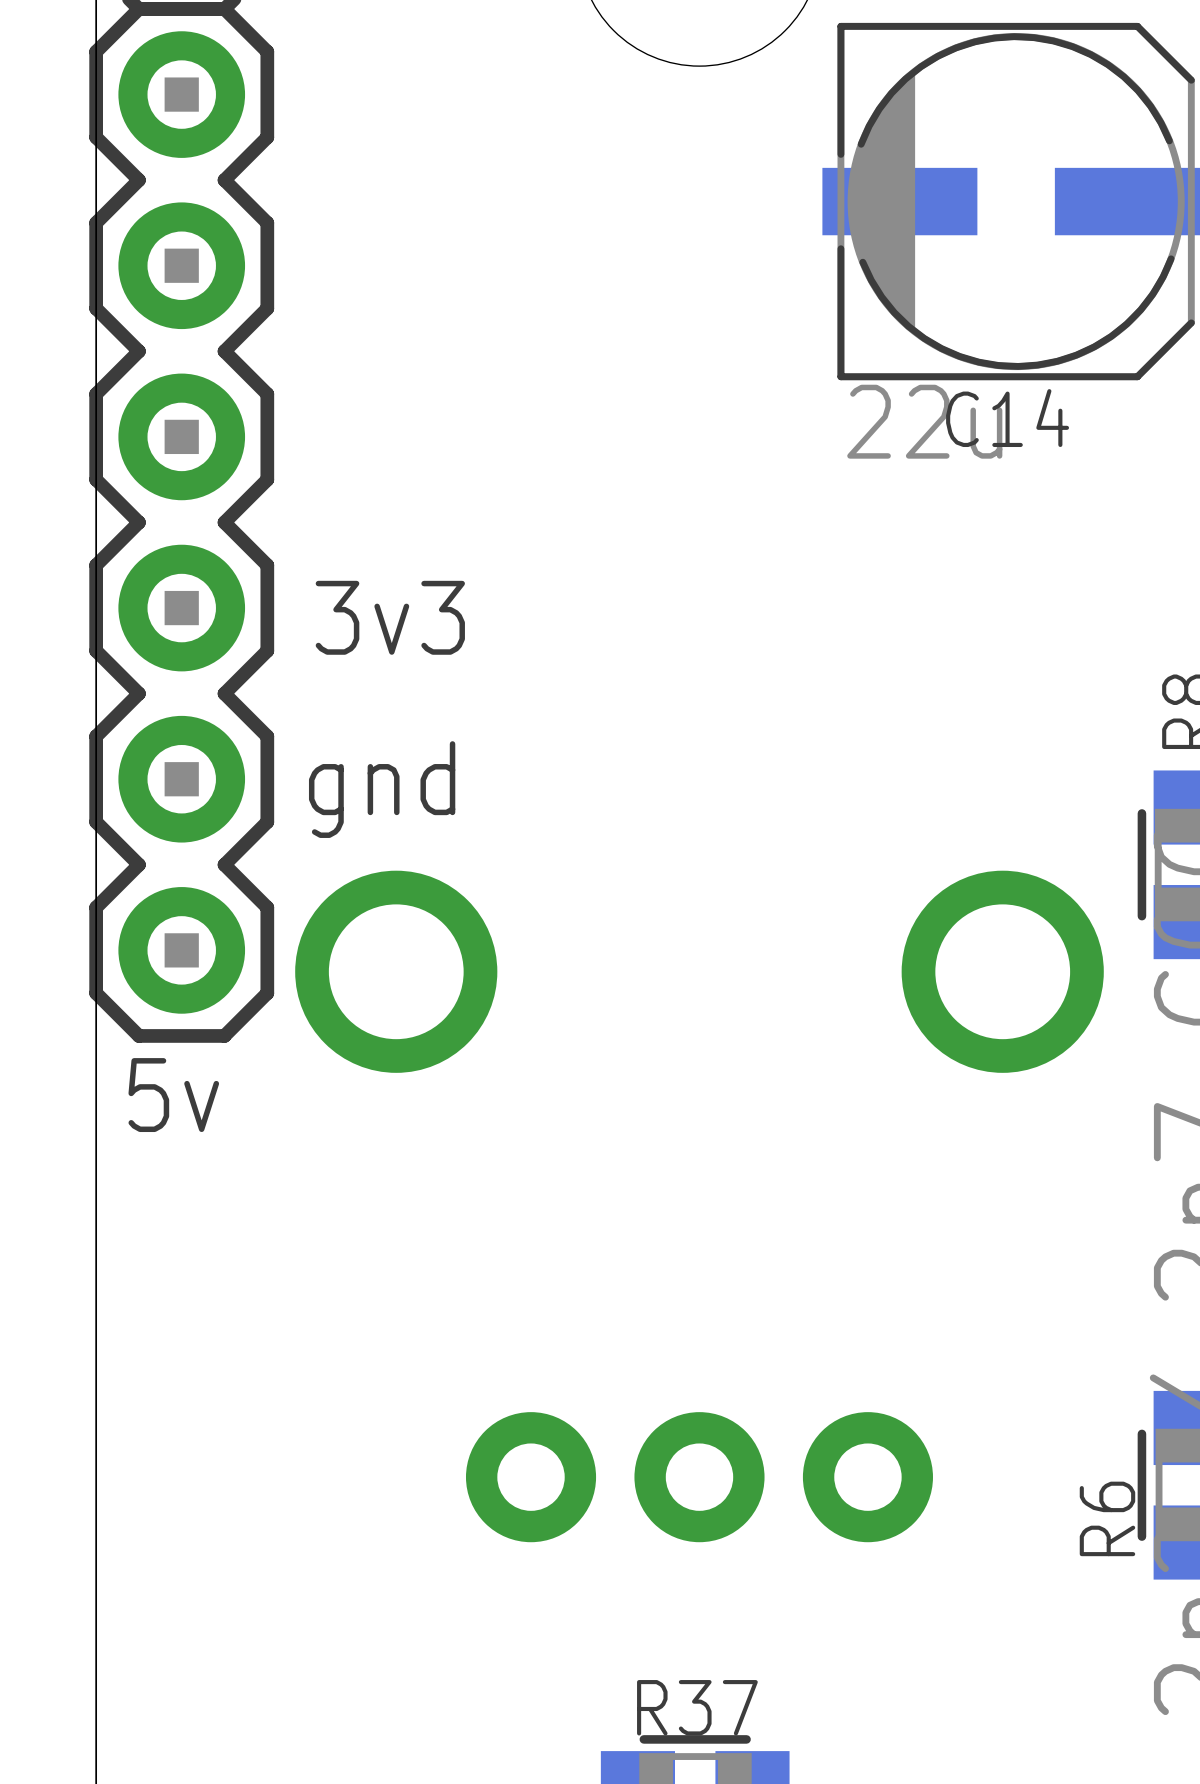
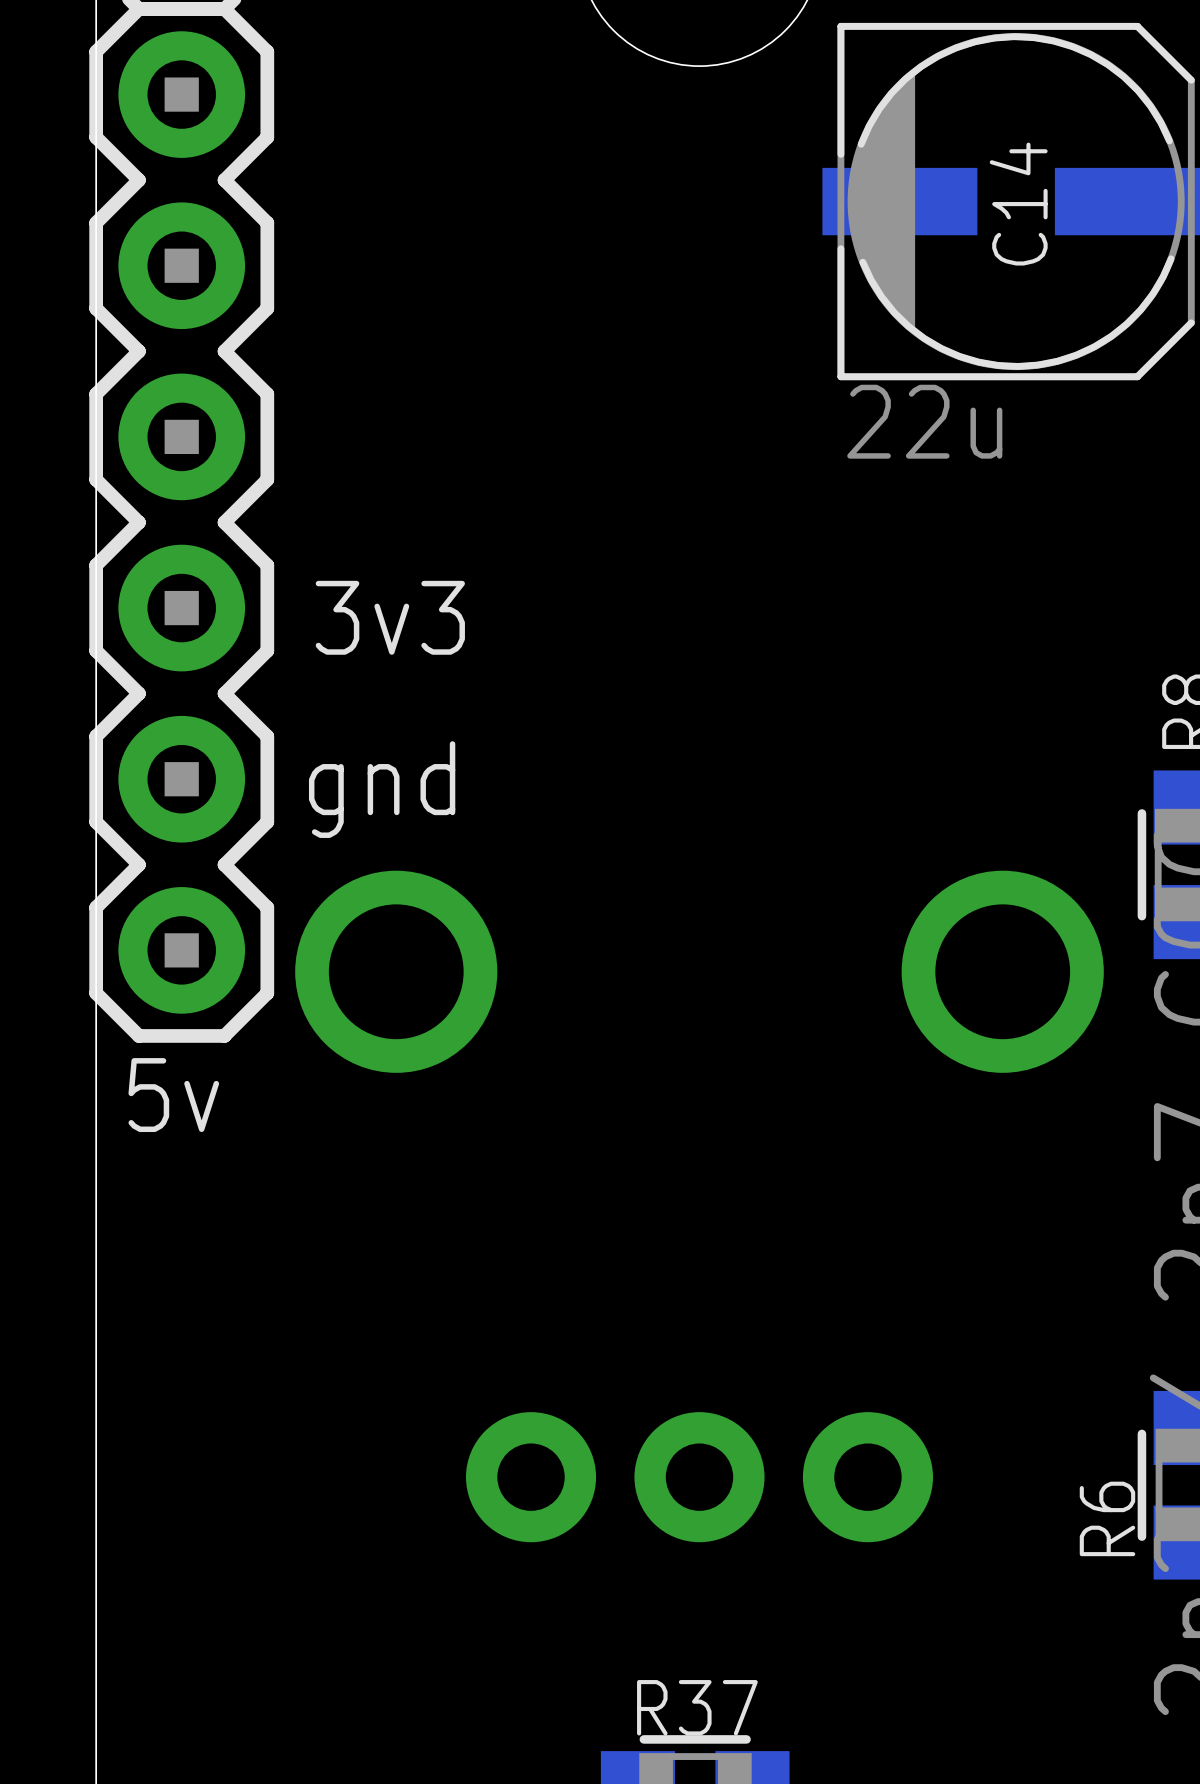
C14 name rotation: 0° (1007, 418) -> 90° counterclockwise (1018, 204)
C14 name position: C14 (1007, 418) -> C14 (1018, 204)

